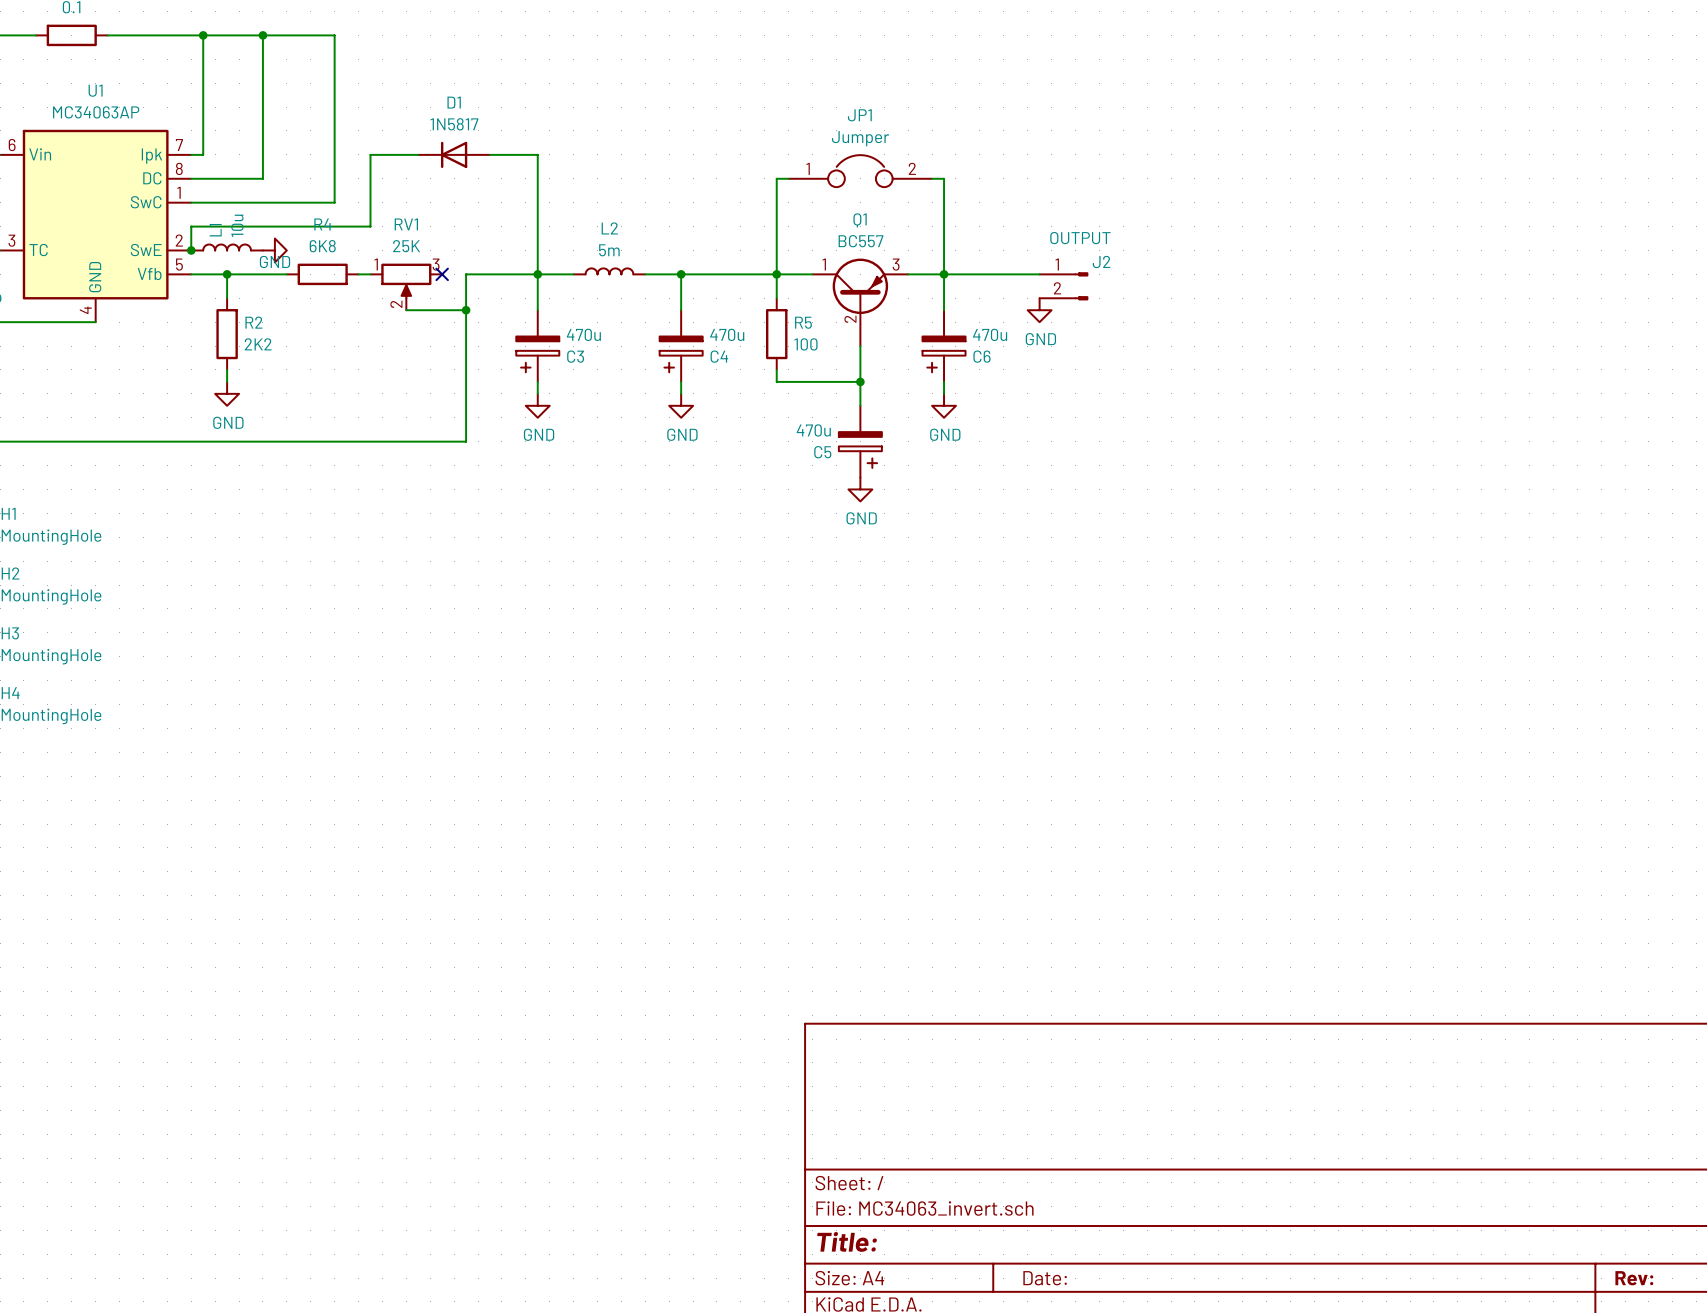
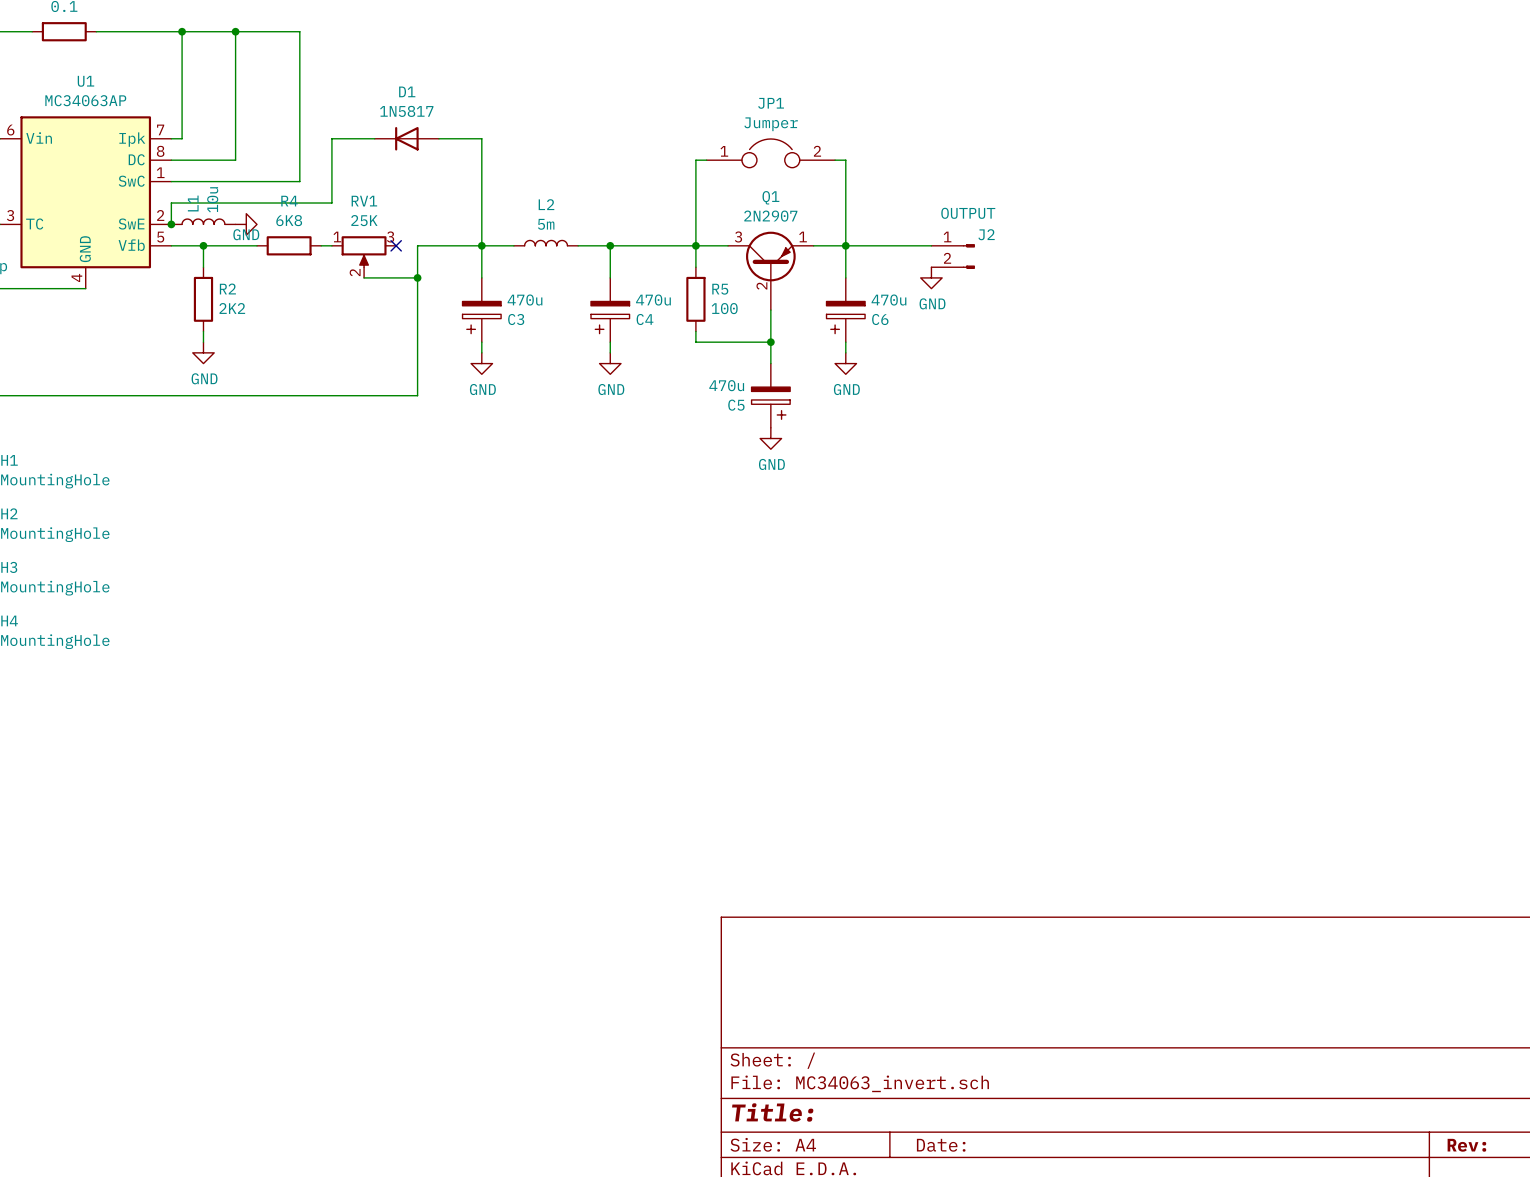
Q1 value: BC557 (860, 241) -> 2N2907 (770, 216)
Q1 pin number: 1 (824, 264) -> 3 (738, 236)
Q1 pin number: 3 (896, 264) -> 1 (803, 236)

